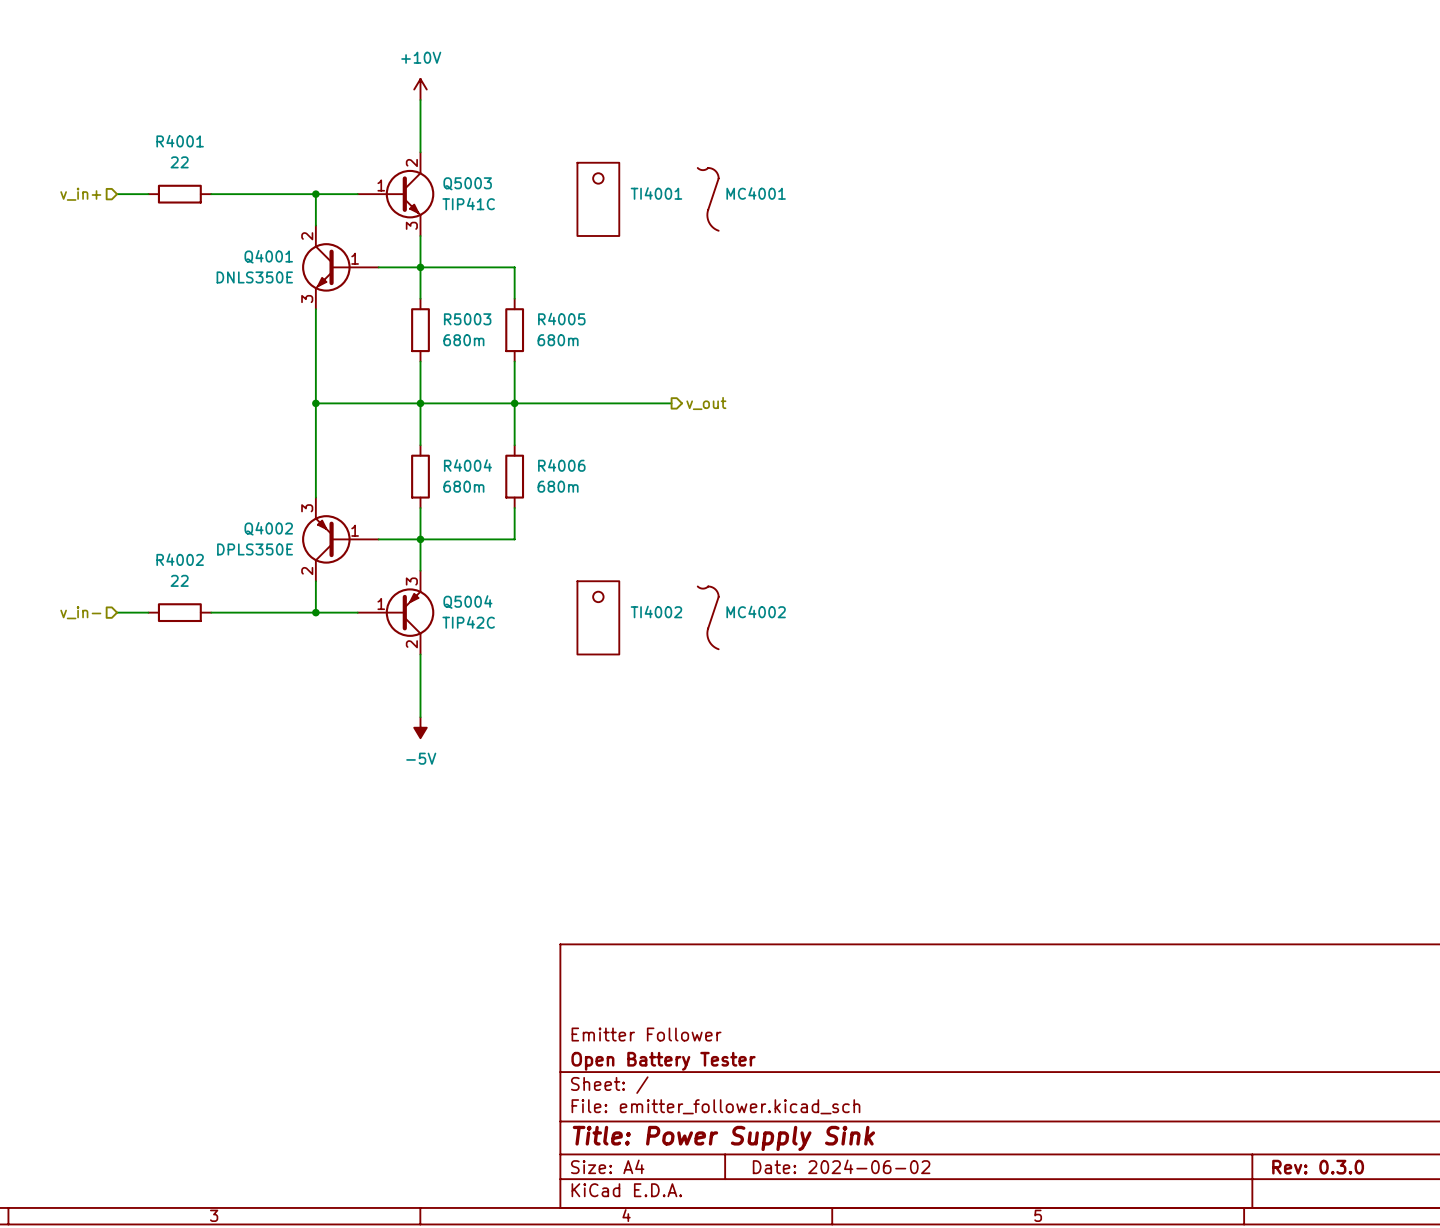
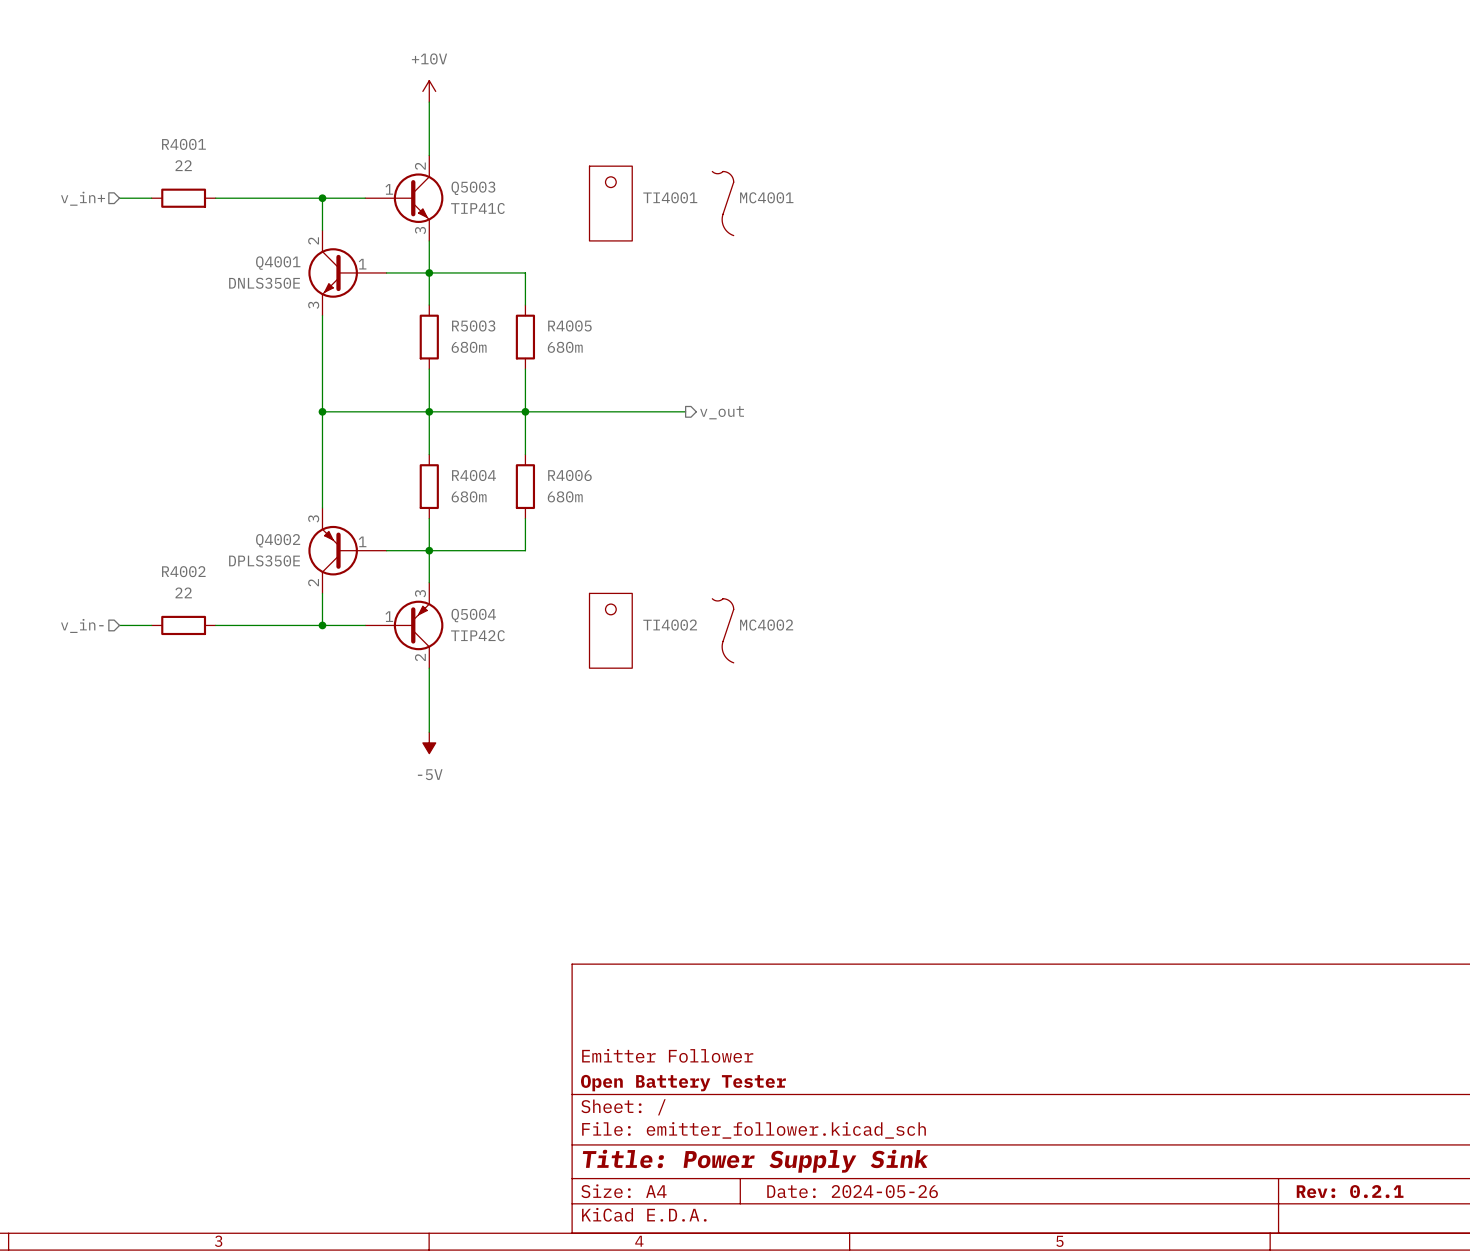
title block: Date: 2024-06-02 (841, 1166) -> Date: 2024-05-26 (852, 1191)
title block: Rev: 0.3.0 (1318, 1167) -> Rev: 0.2.1 (1350, 1191)

